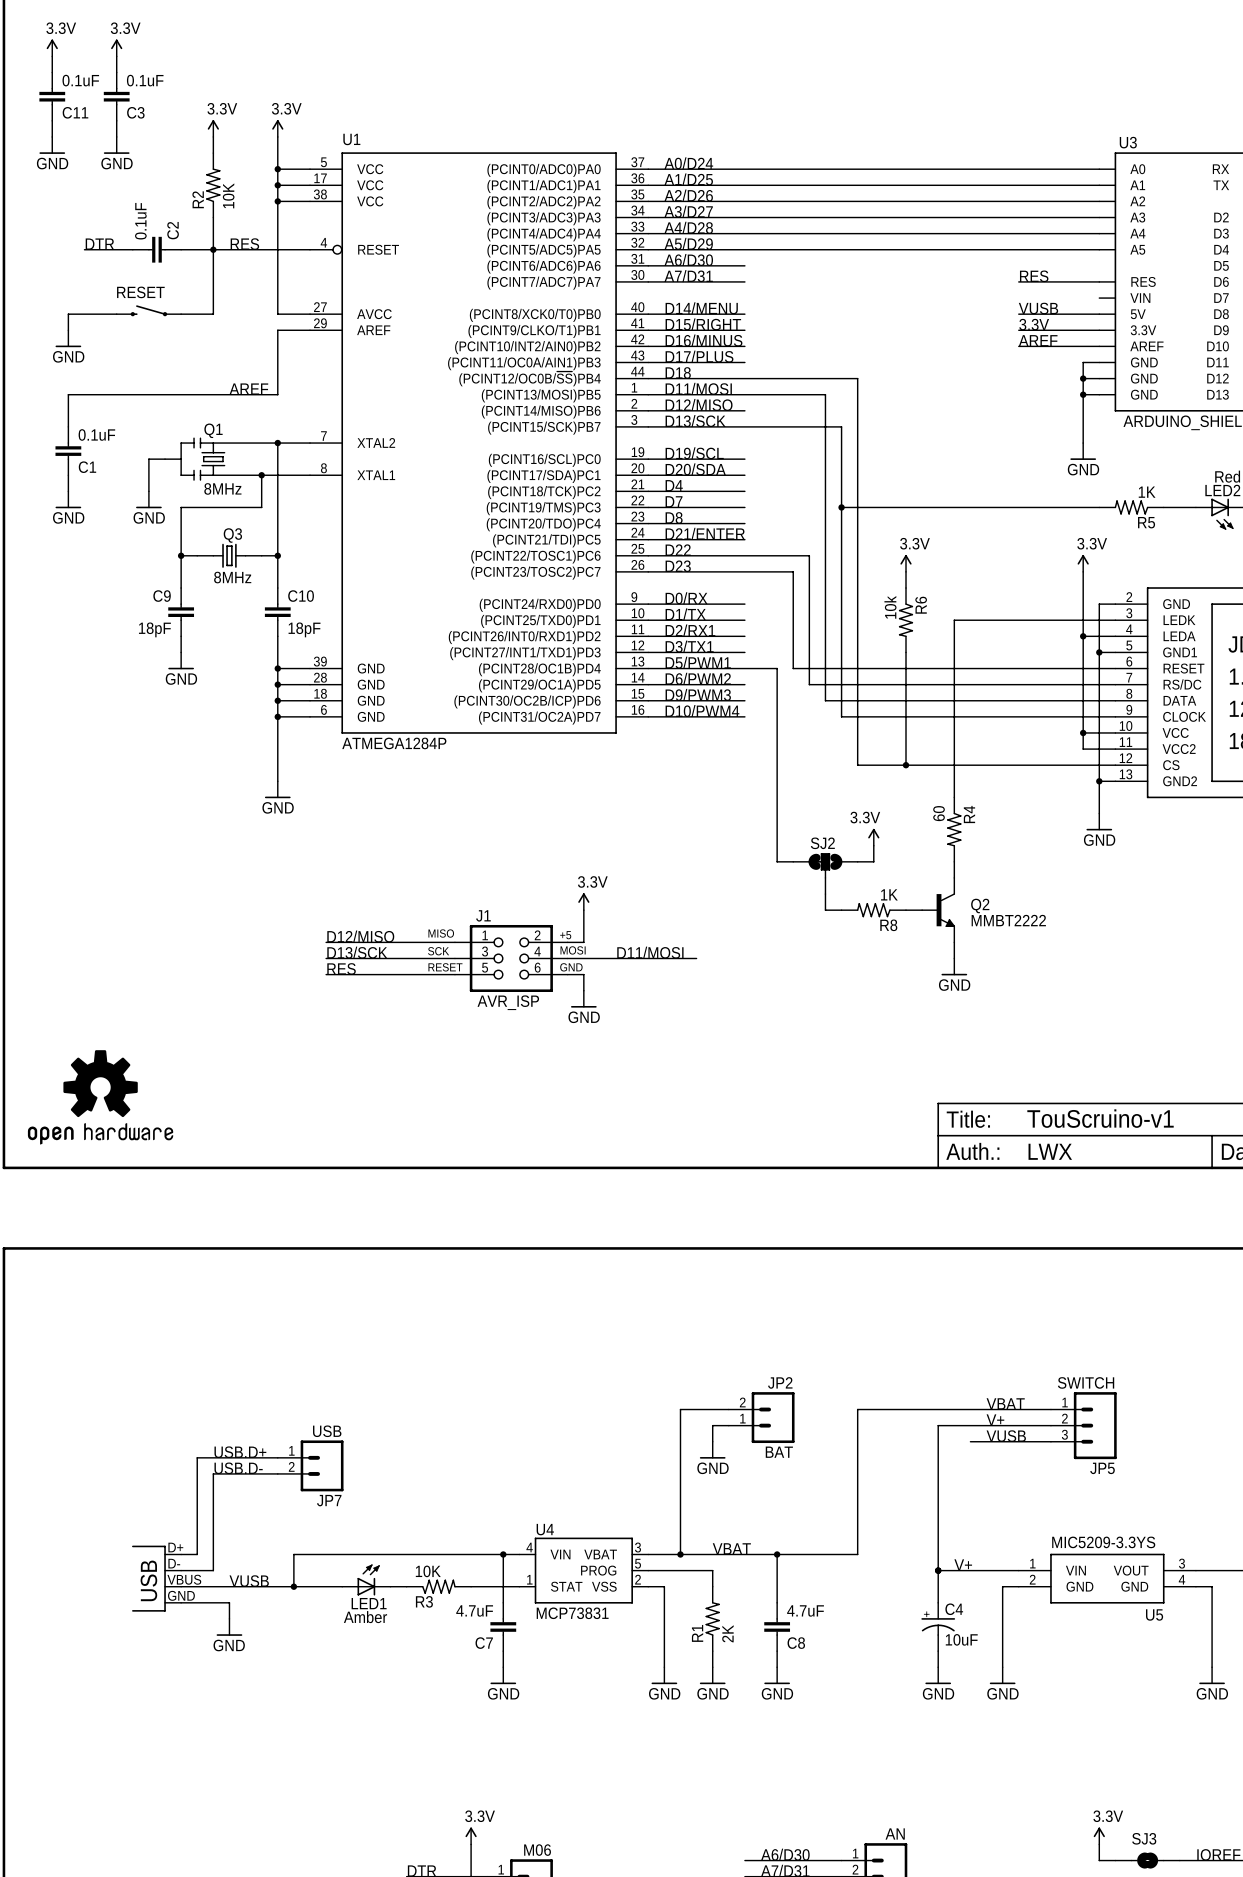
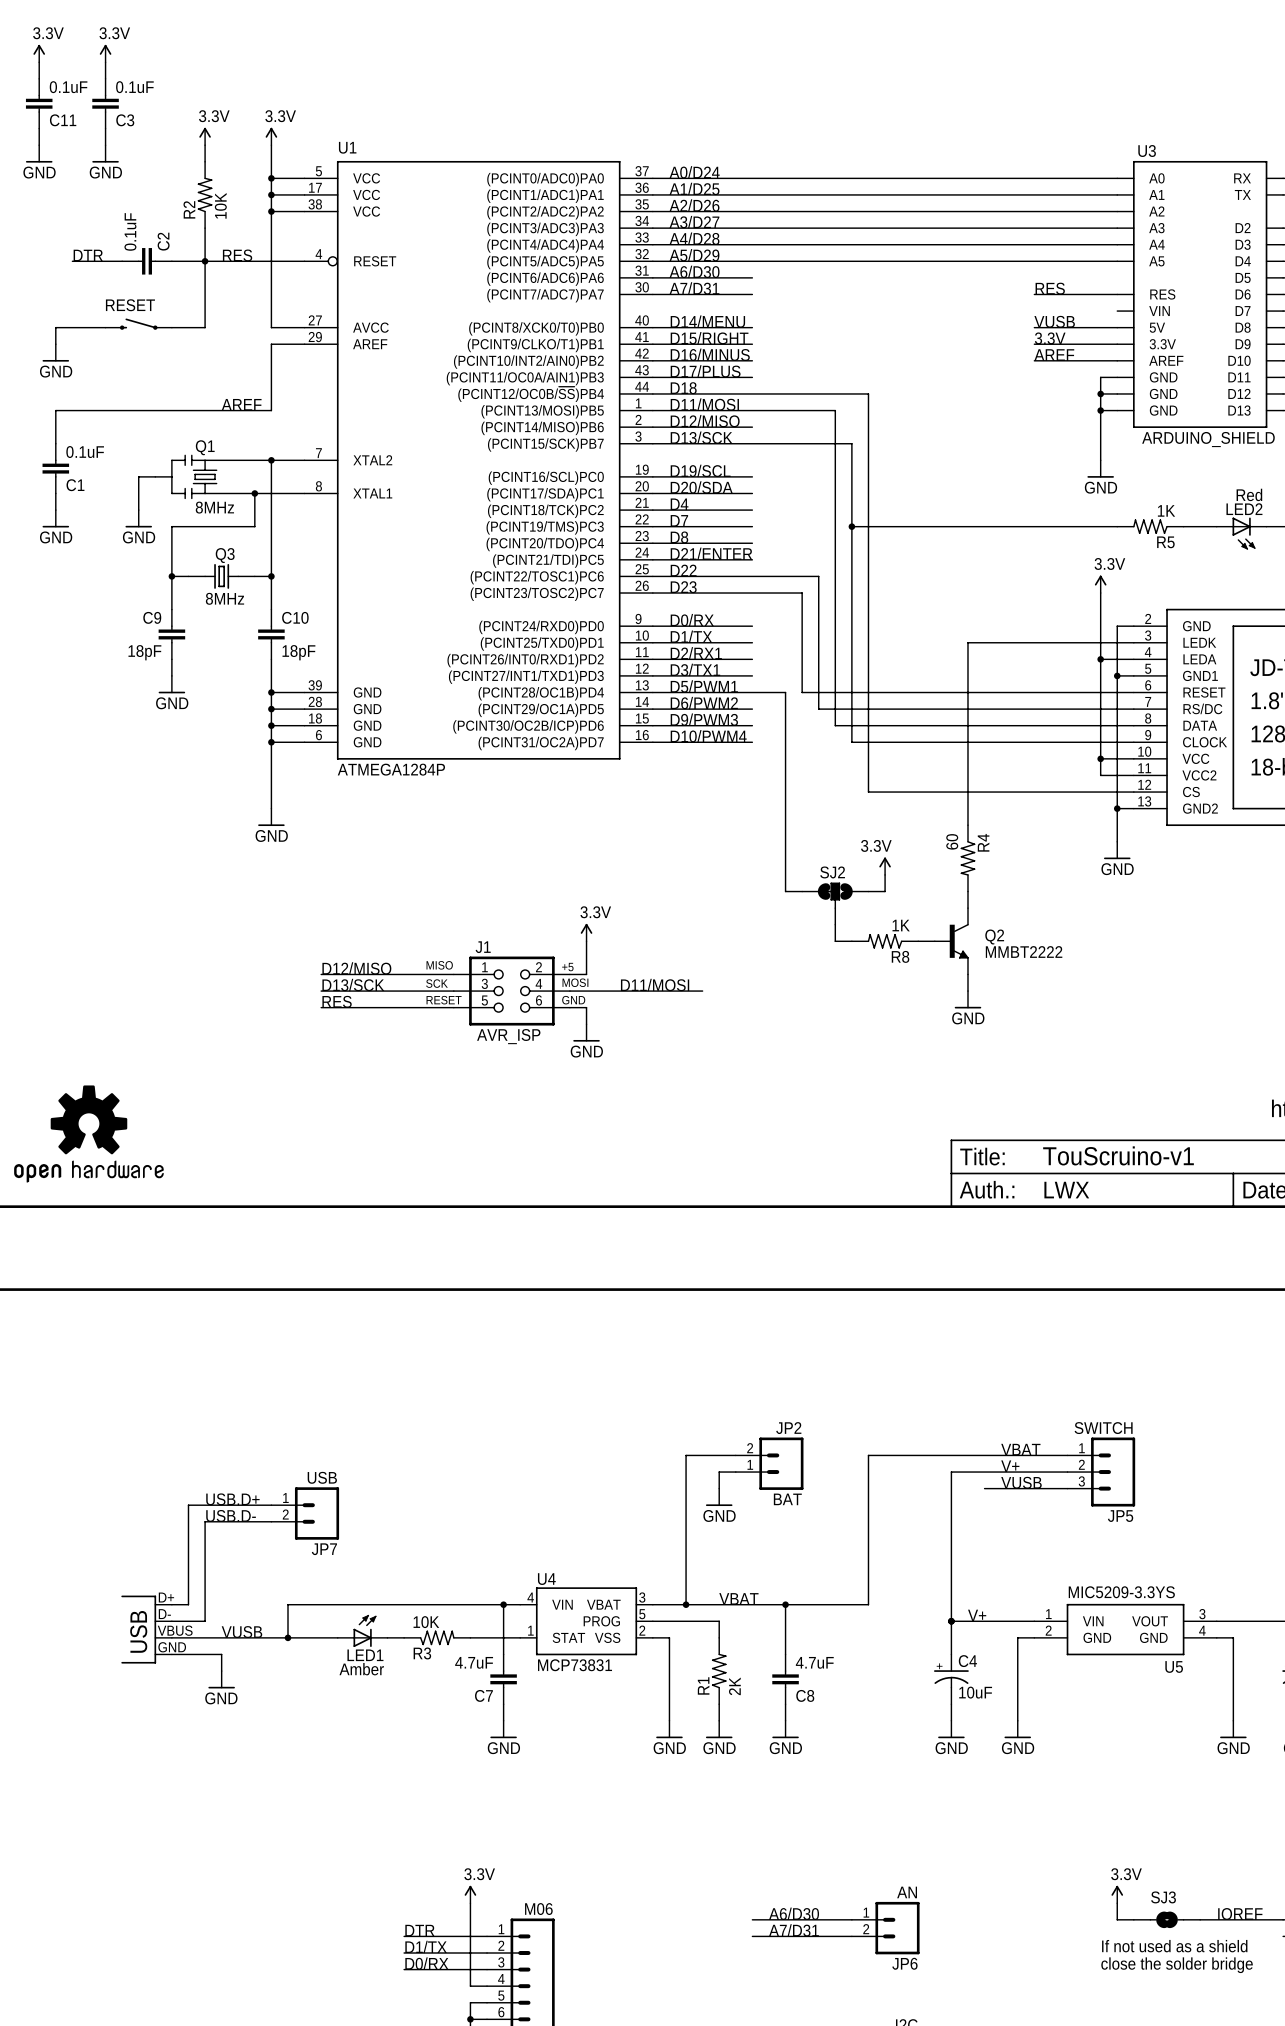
power symbol: 3.3V (906, 563) -> none
wire: (906, 571) (906, 588) -> none
R6: 10k (906, 620) -> none
wire: (906, 652) (906, 765) -> none
junction: (906, 765) -> none

